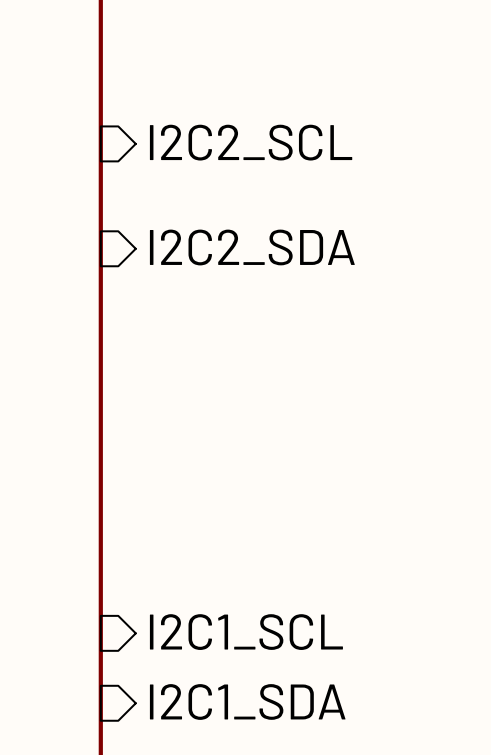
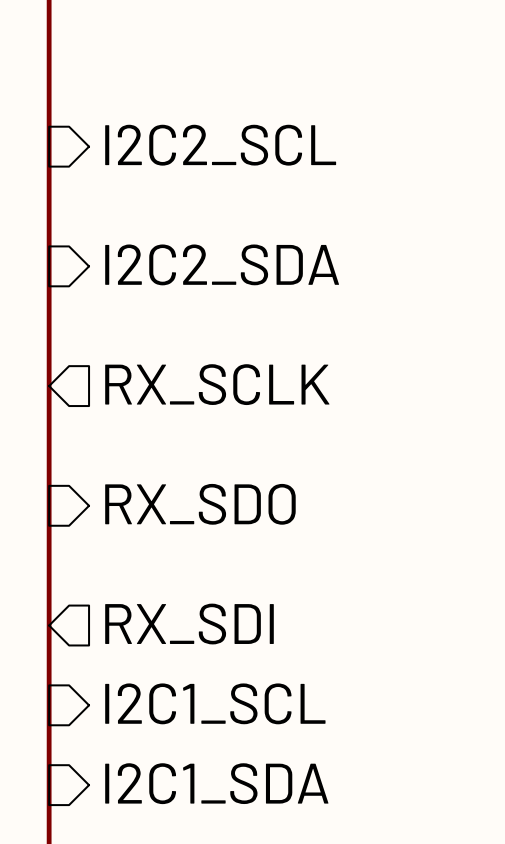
sheet pin: none -> RX_SCLK (217, 384)
sheet pin: none -> RX_SDO (200, 504)
sheet pin: none -> RX_SDI (189, 624)

